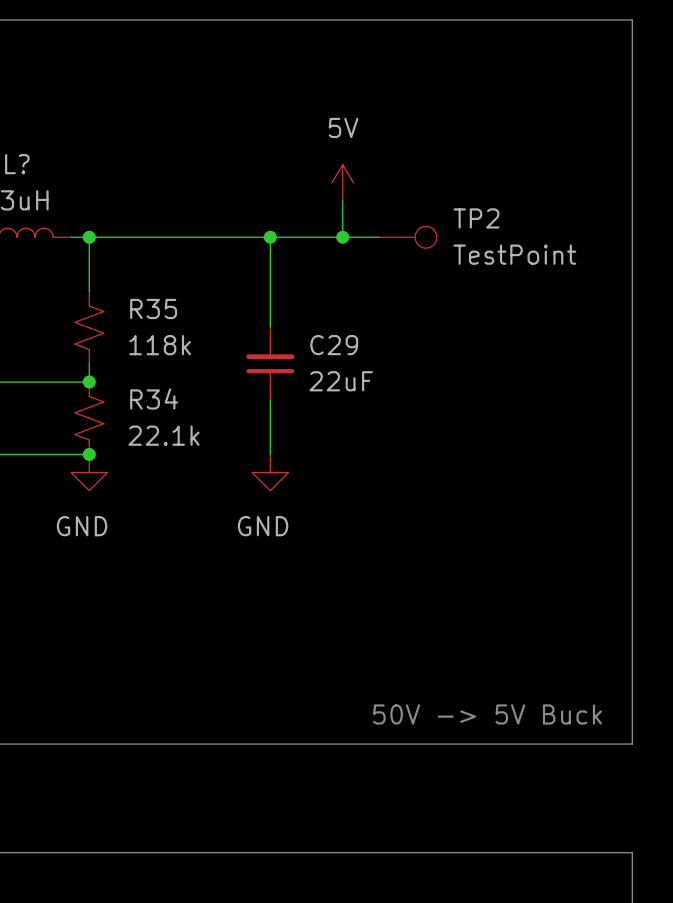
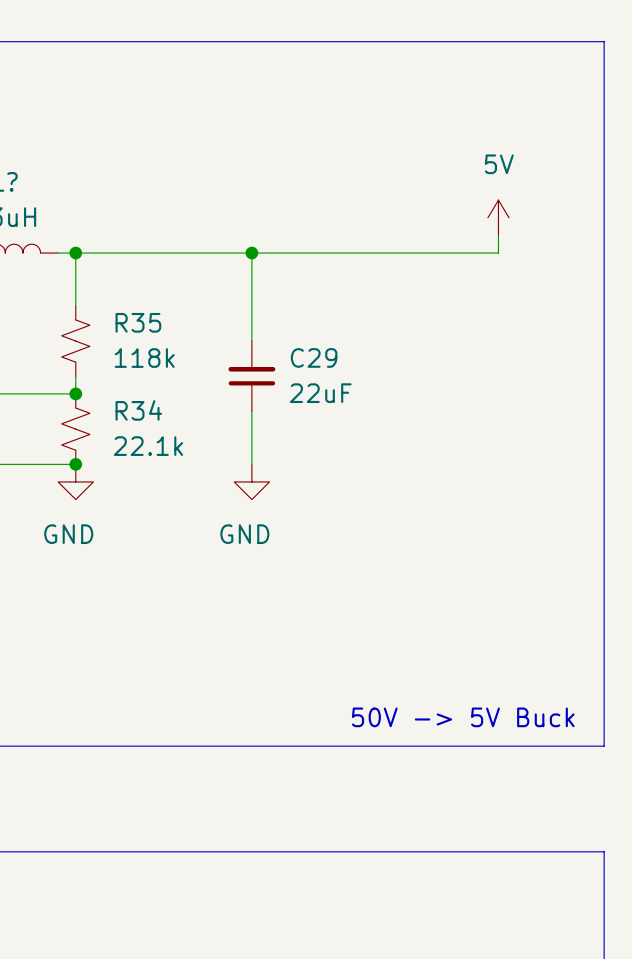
power symbol position: 5V (342, 182) -> 5V (498, 217)
wire: (342, 201) (342, 237) -> none
wire: none -> (498, 235) (498, 253) (357, 253)
junction: (342, 237) -> none
TP2: TestPoint (407, 237) -> none

